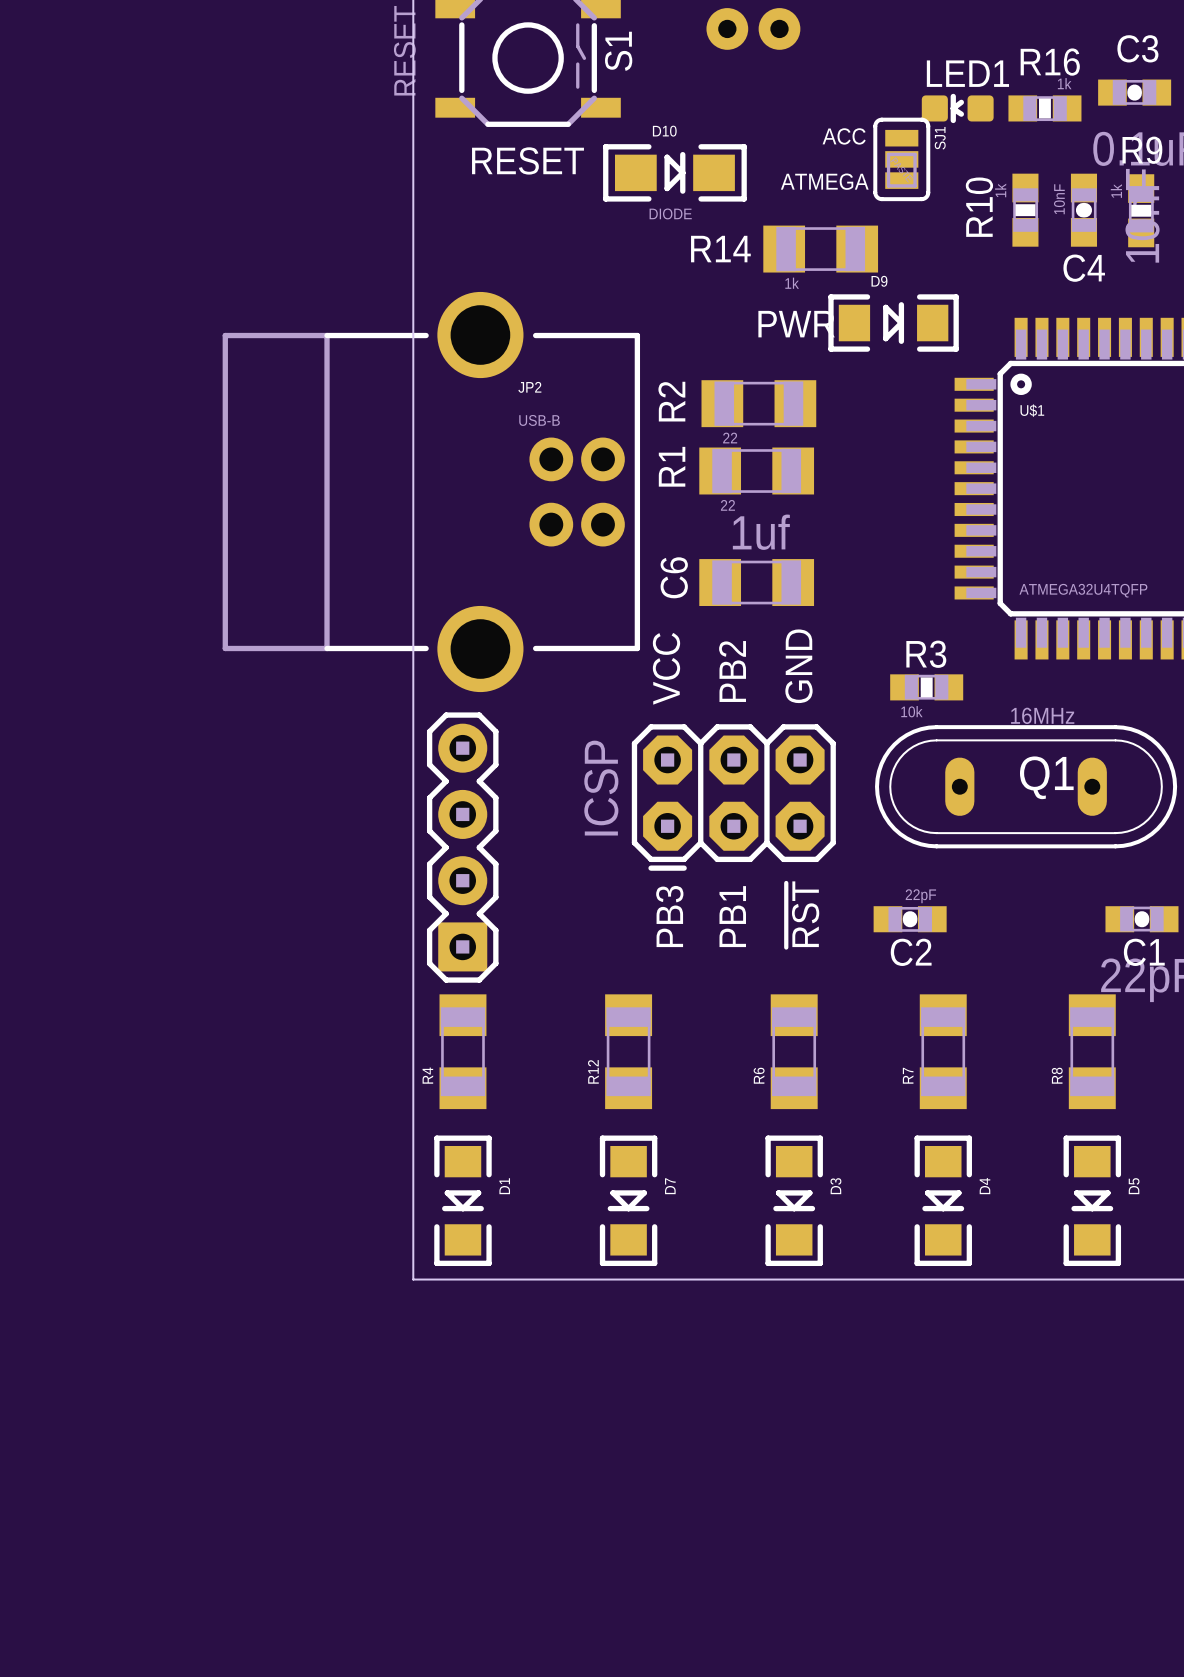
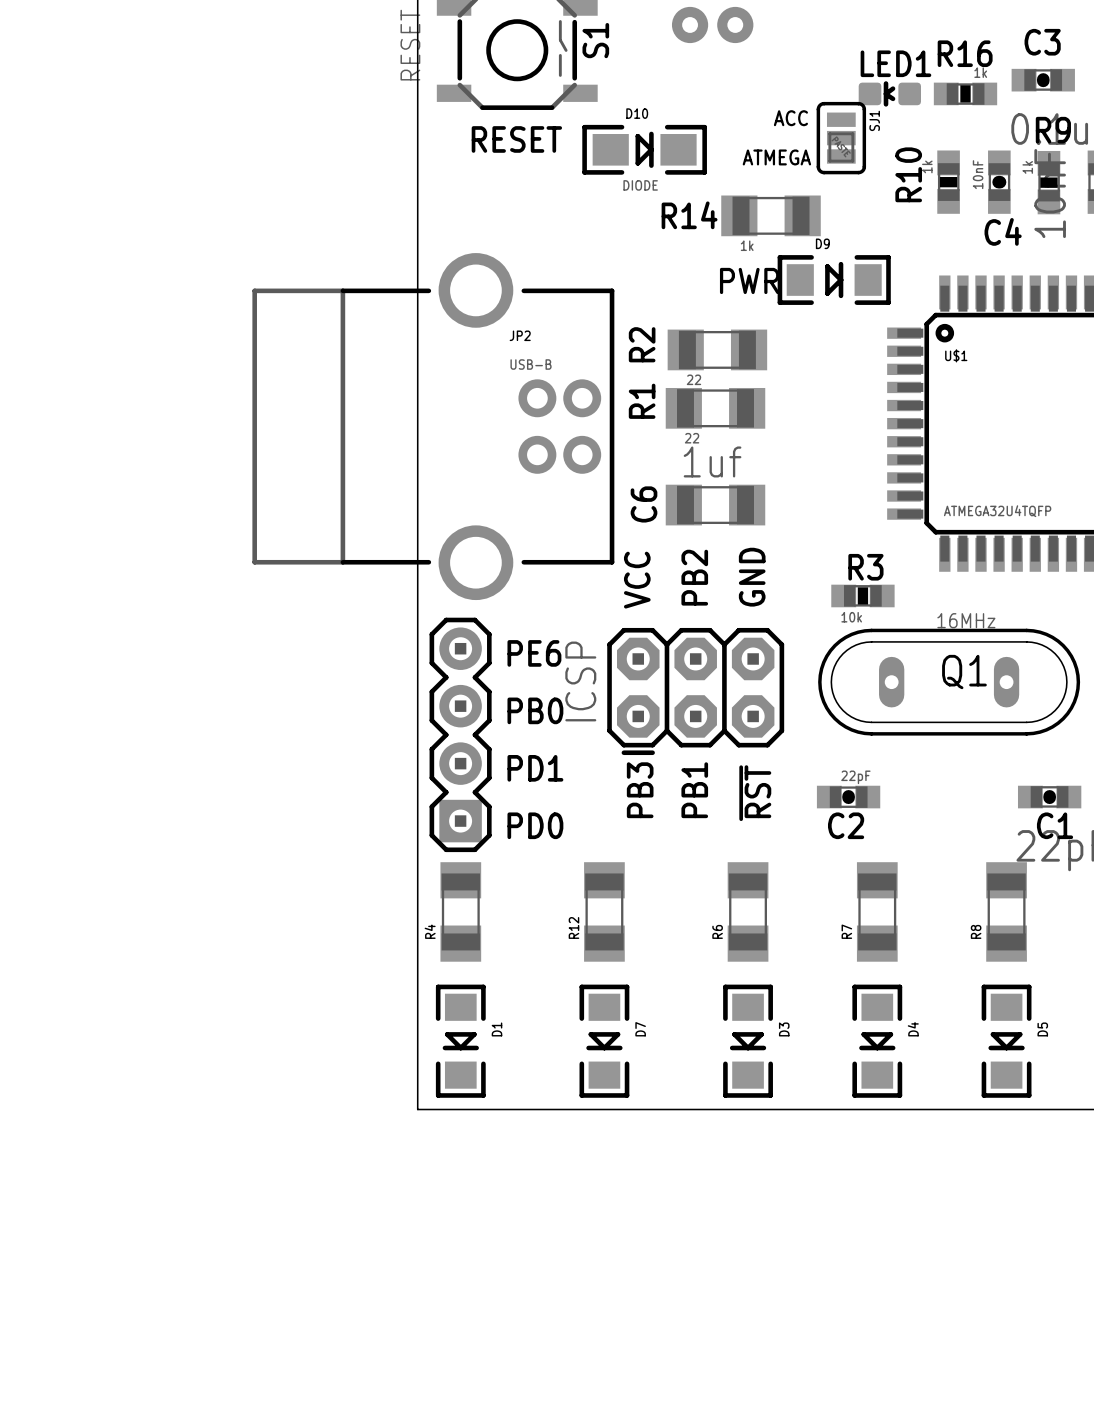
text: none -> PE6 (534, 653)
text: none -> PB0 (535, 710)
text: none -> PD1 (535, 768)
text: none -> PD0 (535, 825)

